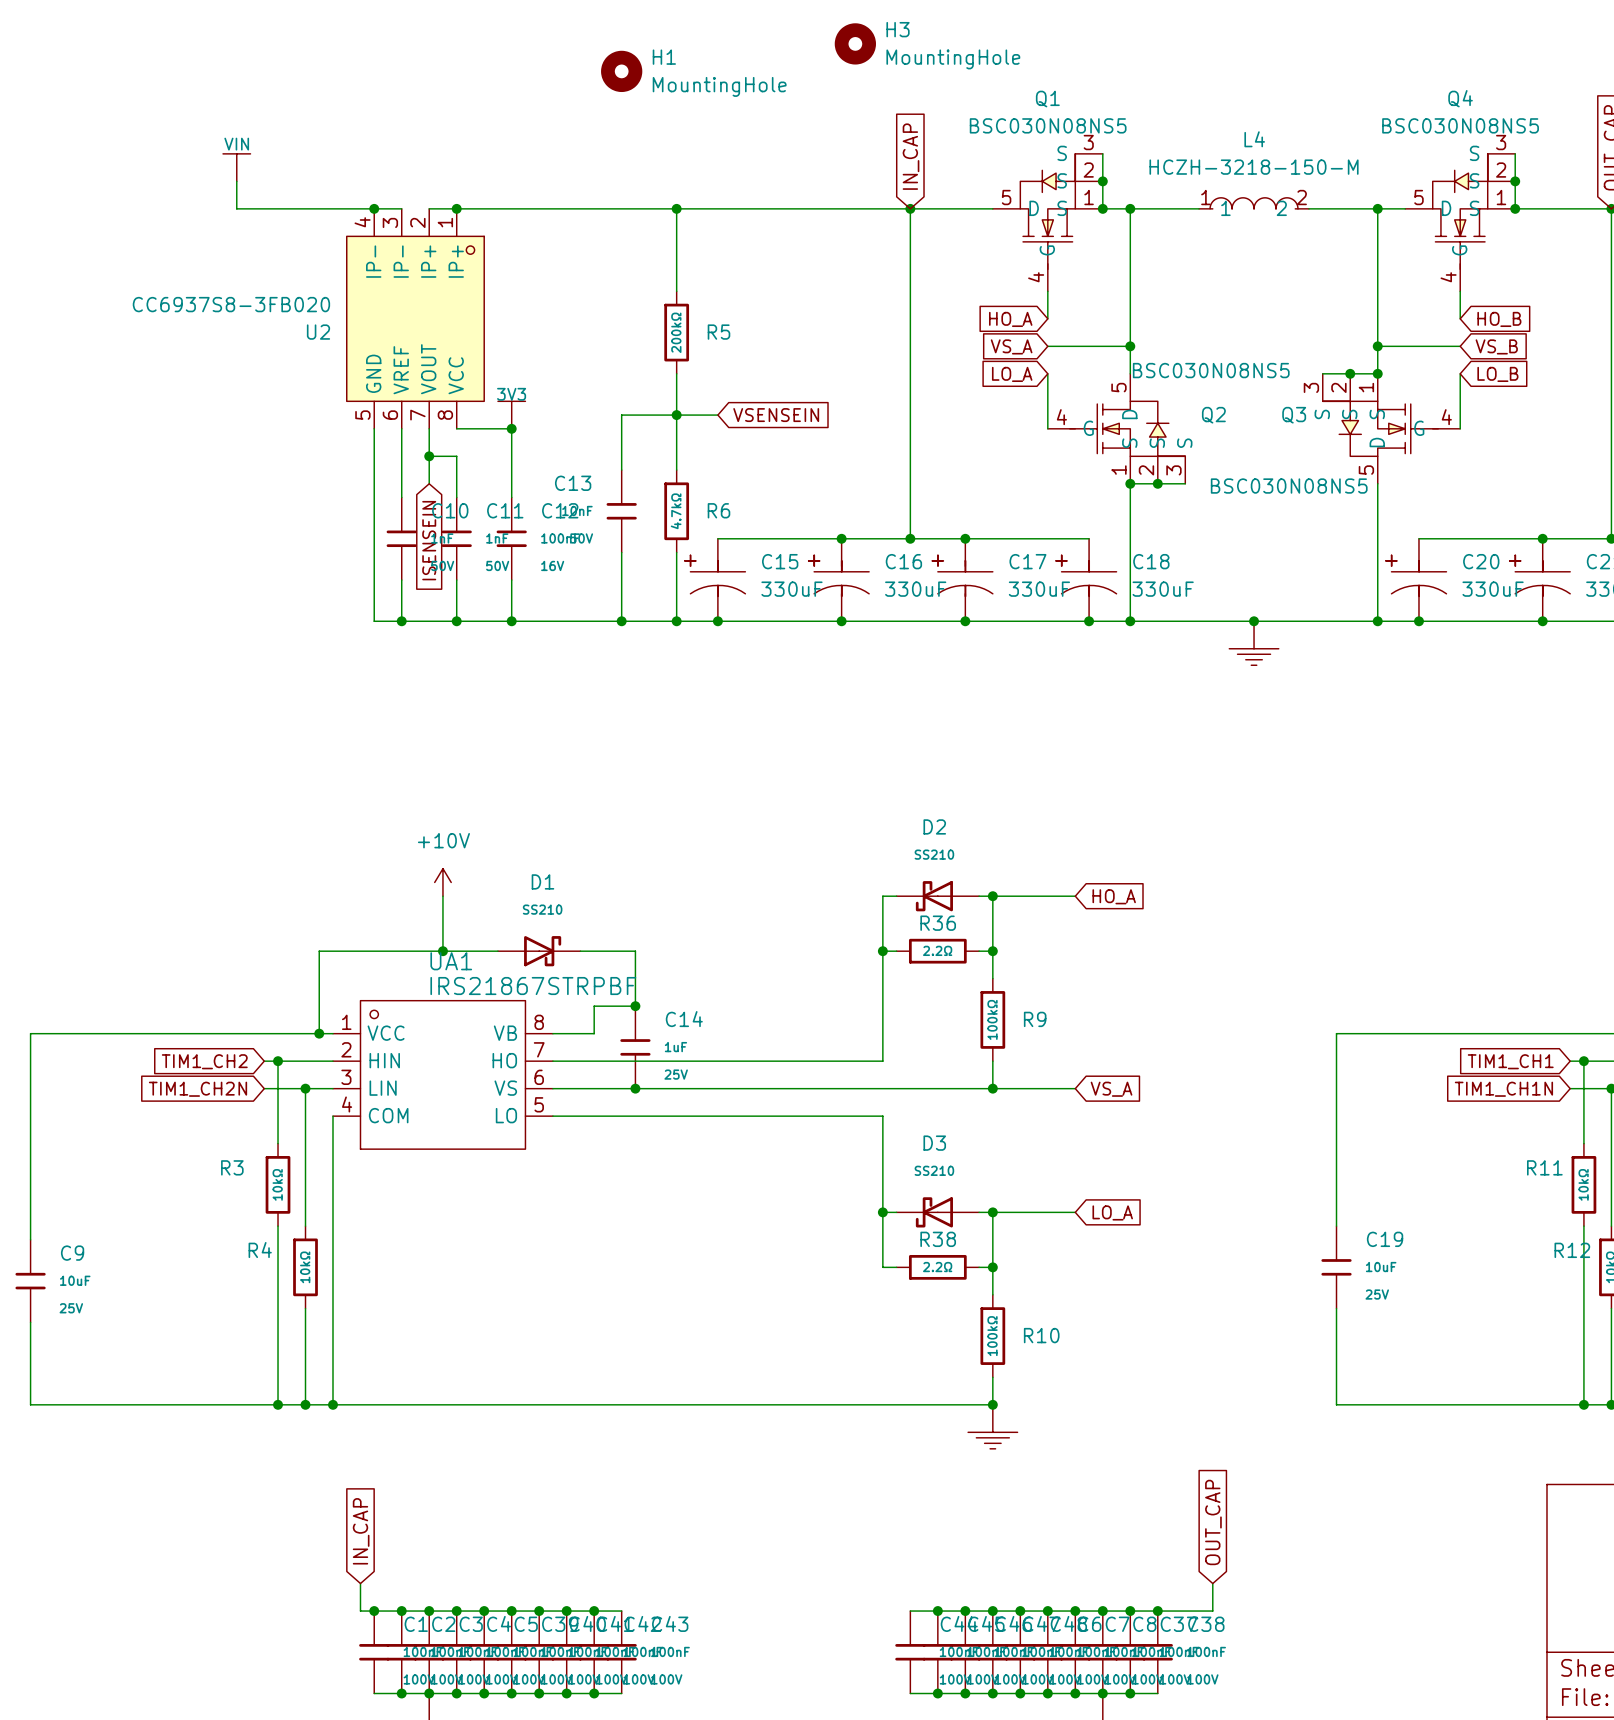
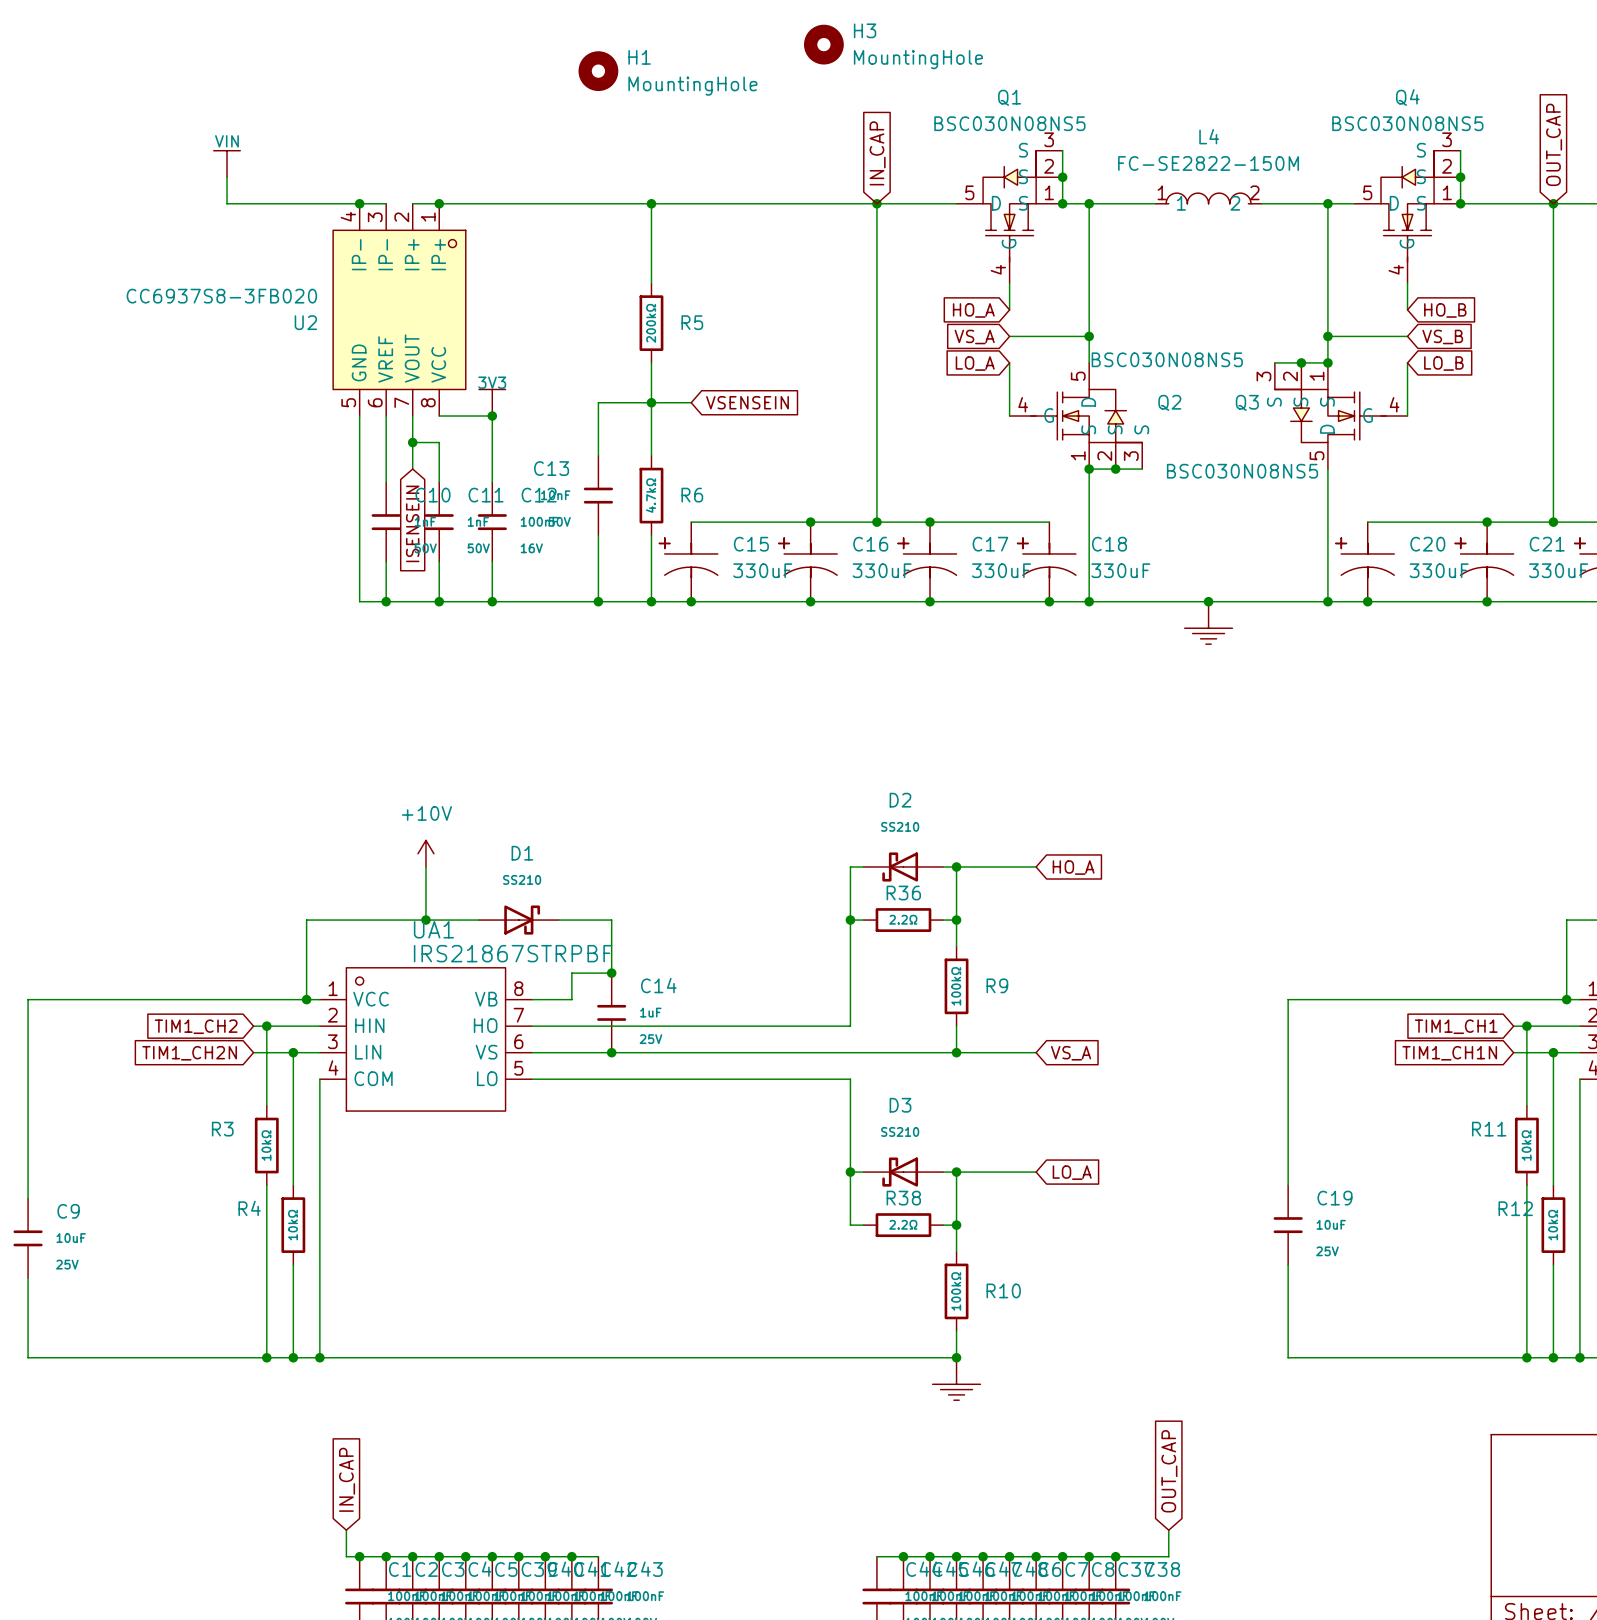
L4 value: HCZH-3218-150-M (1254, 167) -> FC-SE2822-150M (1208, 163)

